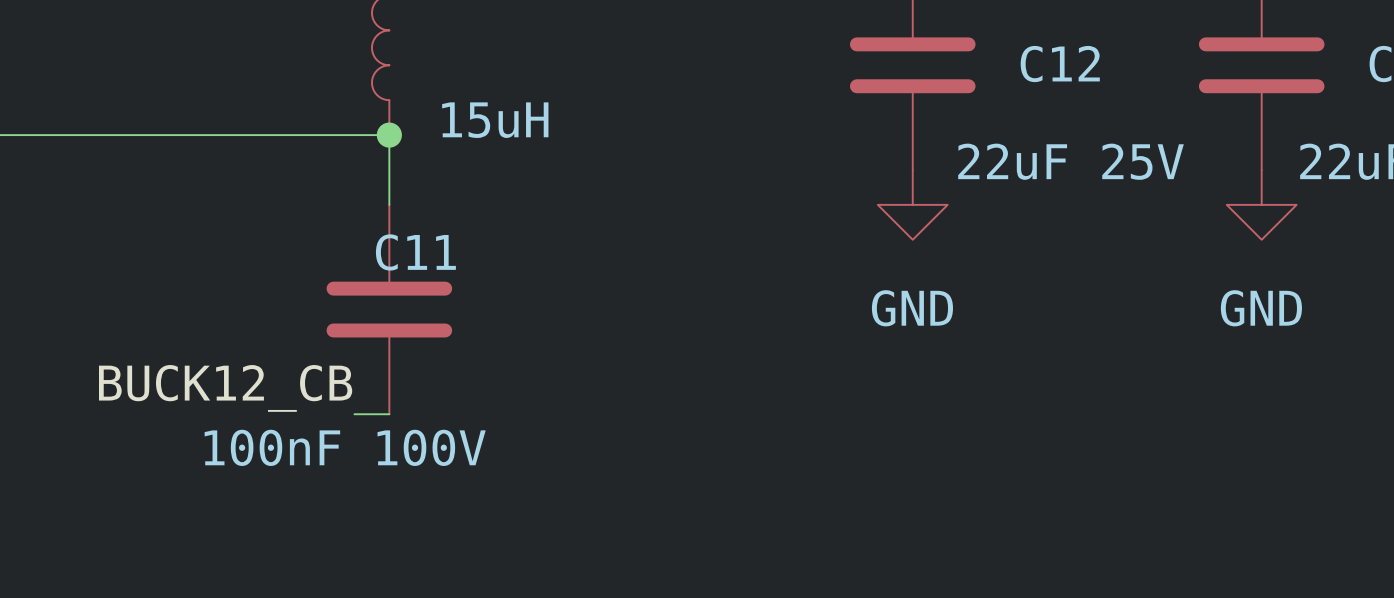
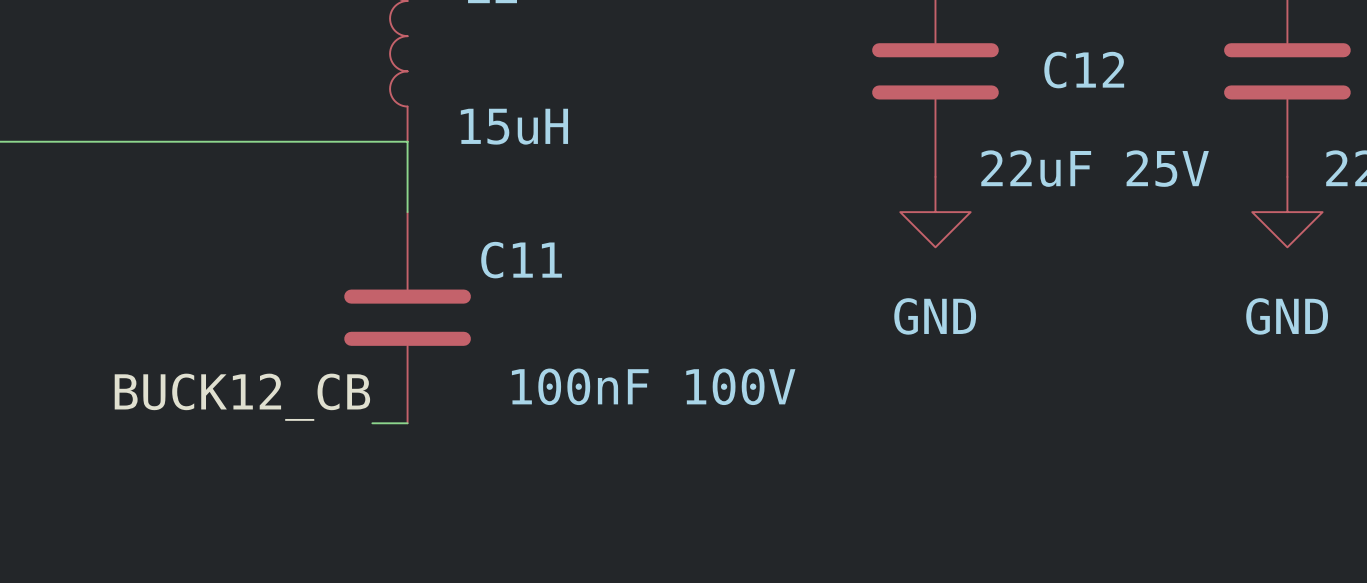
junction: (389, 135) -> none
C11 name position: C11 (415, 252) -> C11 (521, 260)
C11 value position: 100nF 100V (345, 447) -> 100nF 100V (653, 386)

